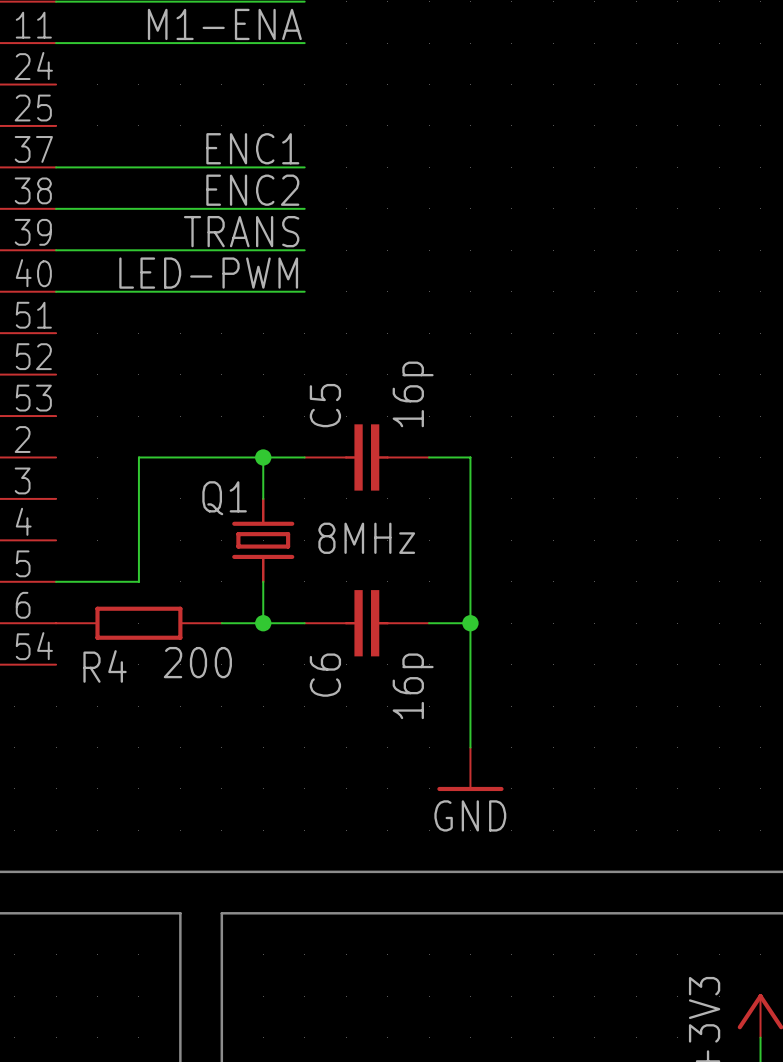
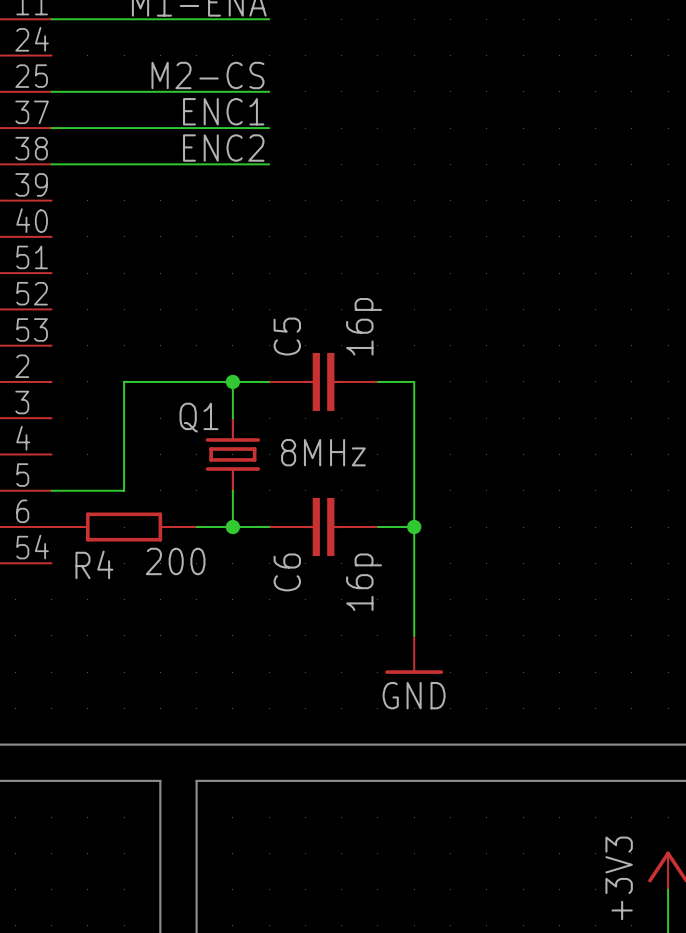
label: none -> M2-CS (207, 75)
label: TRANS (241, 231) -> none
wire: (56, 250) (304, 250) -> (51, 91) (269, 91)
label: LED-PWM (208, 273) -> none
wire: (56, 291) (304, 291) -> none

